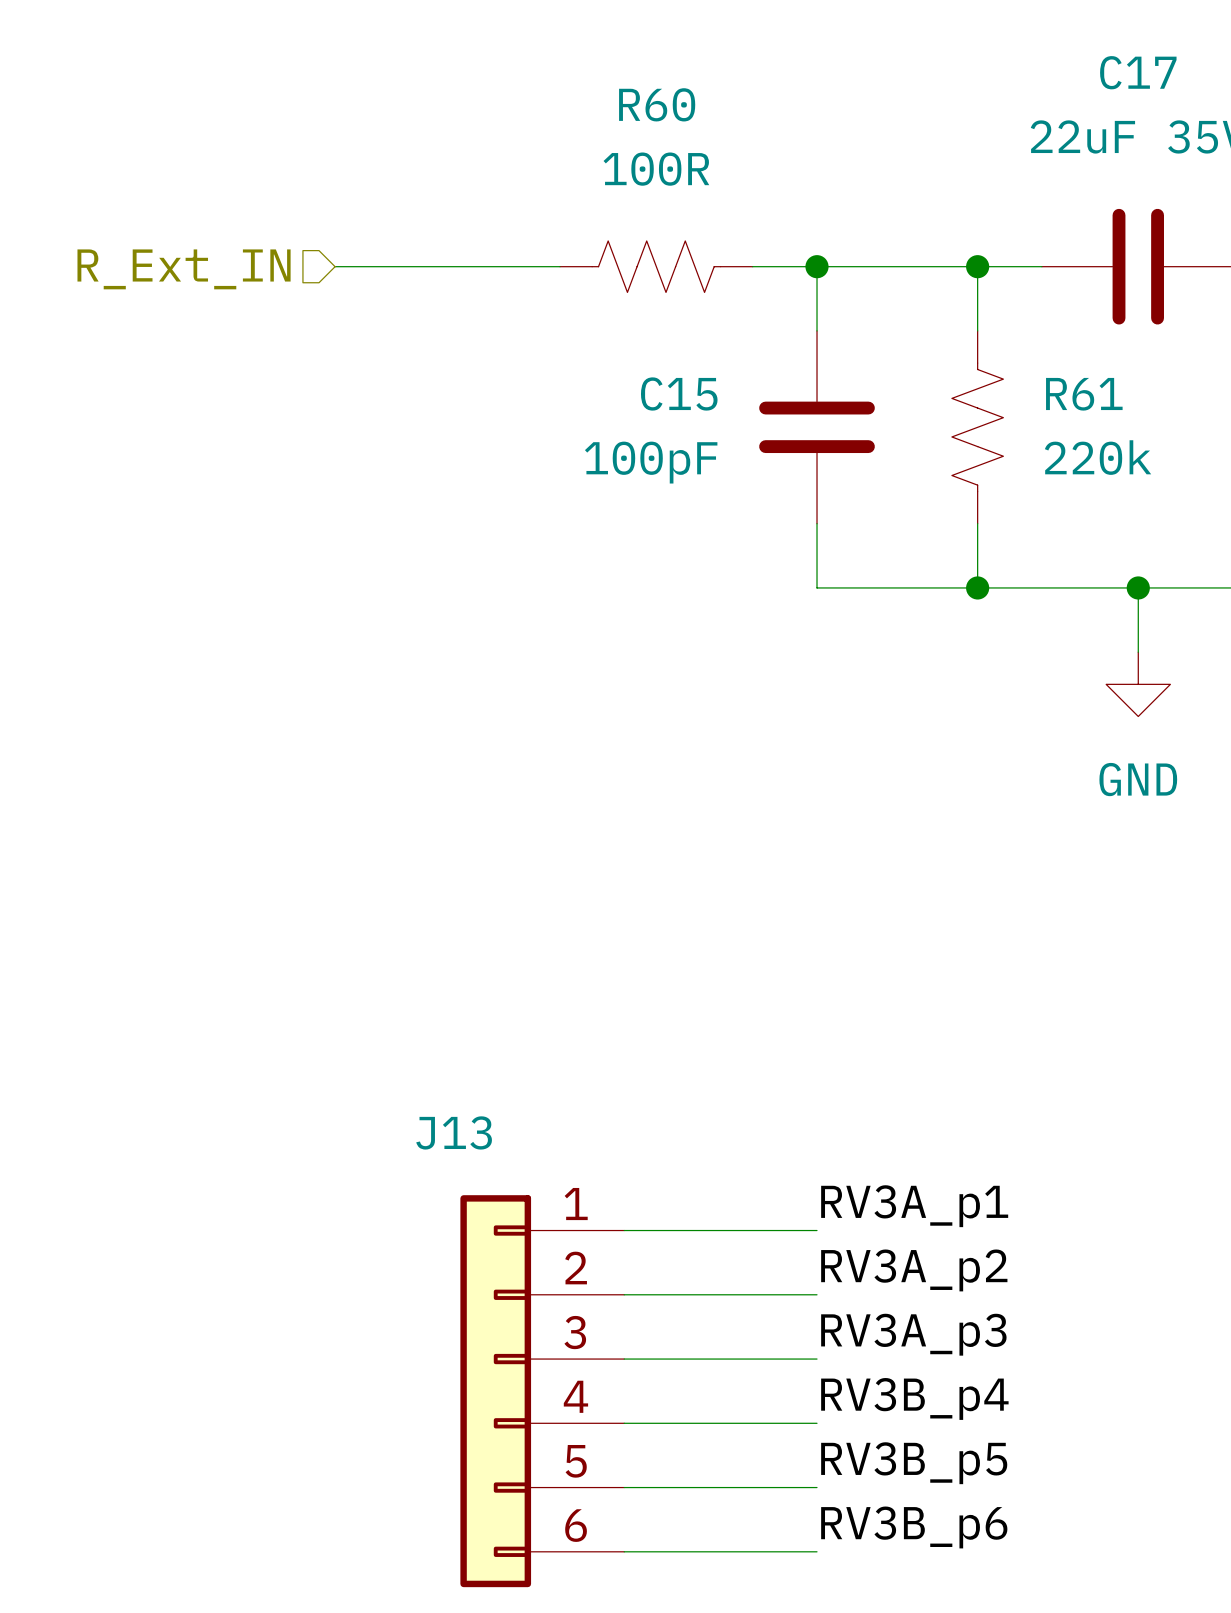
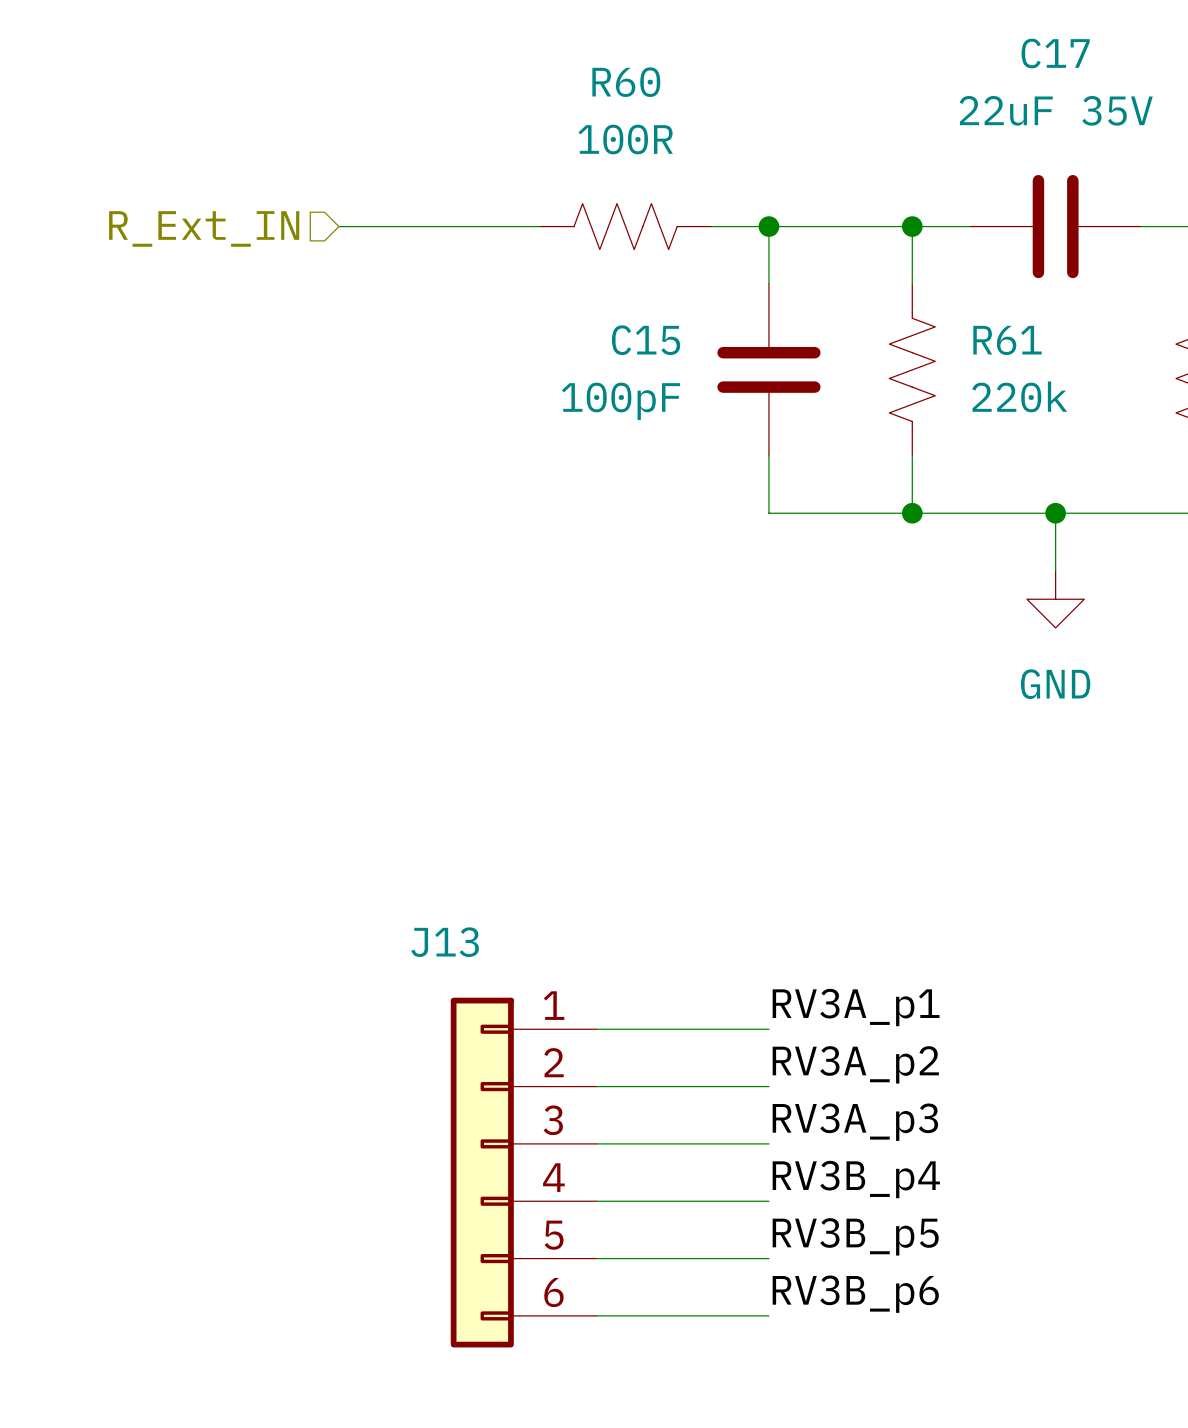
label: none -> RV3A_p1 (856, 1007)
label: RV3A_p1 (914, 1206) -> RV3A_p2 (855, 1064)
label: RV3A_p2 (914, 1270) -> RV3A_p3 (855, 1122)
label: RV3A_p3 (913, 1334) -> RV3B_p4 (856, 1179)
J13 position: (542, 1391) -> (523, 1172)
label: RV3B_p4 (914, 1398) -> RV3B_p5 (855, 1236)
label: RV3B_p5 (914, 1463) -> RV3B_p6 (855, 1294)
label: RV3B_p6 (914, 1527) -> none
wire: (624, 1551) (817, 1551) -> (596, 1029) (768, 1029)

